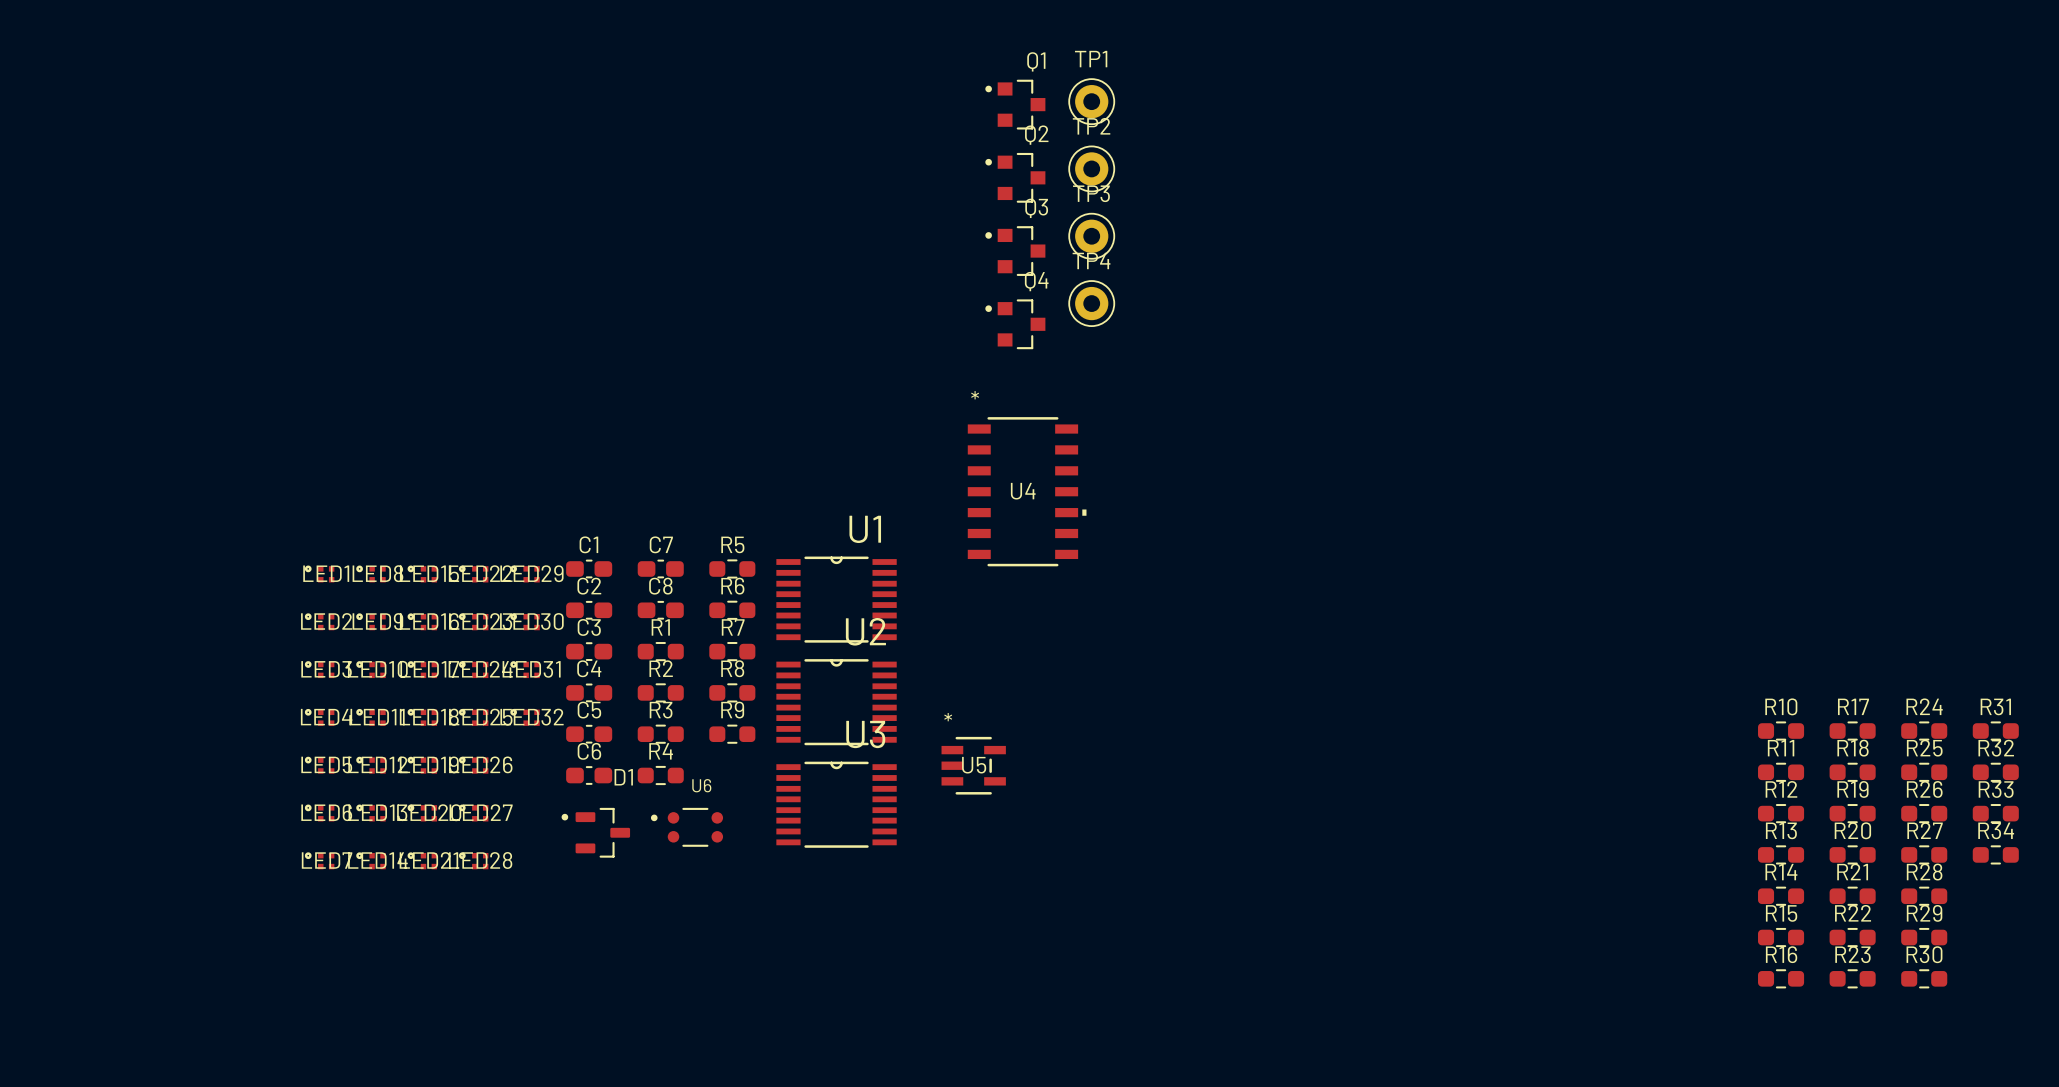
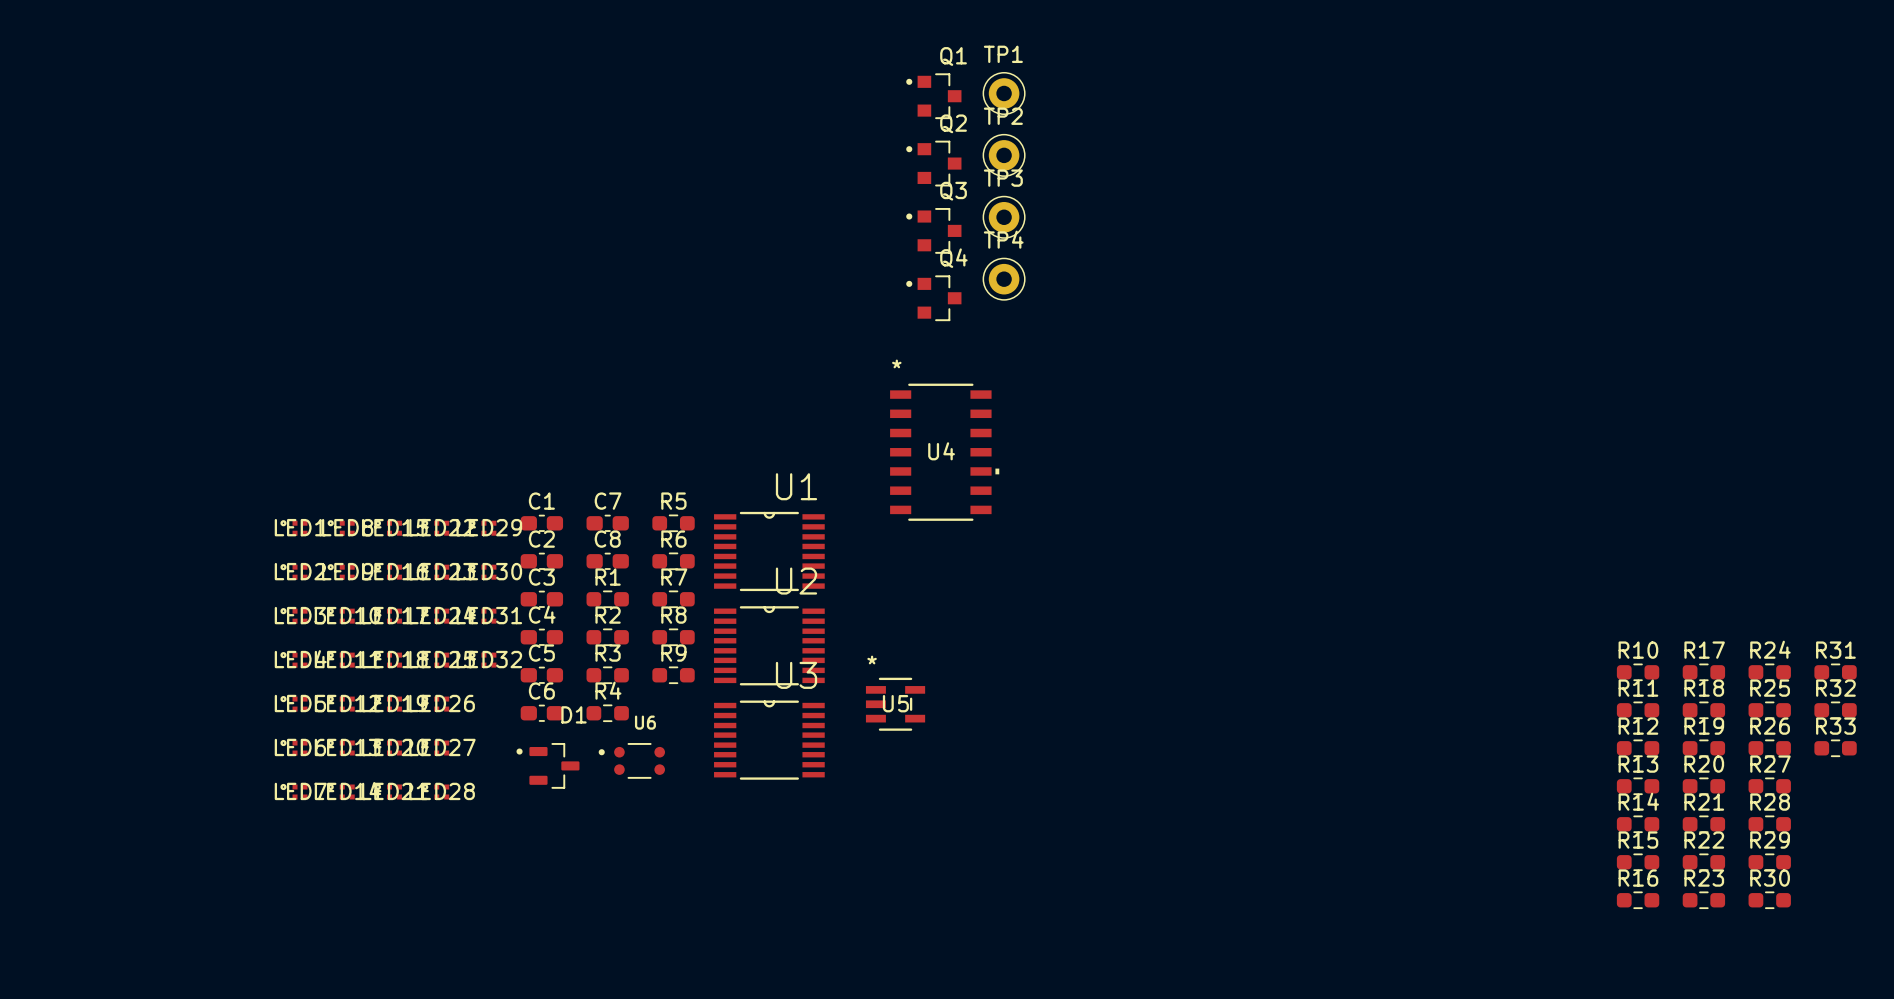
R34: (1995, 854) -> none

